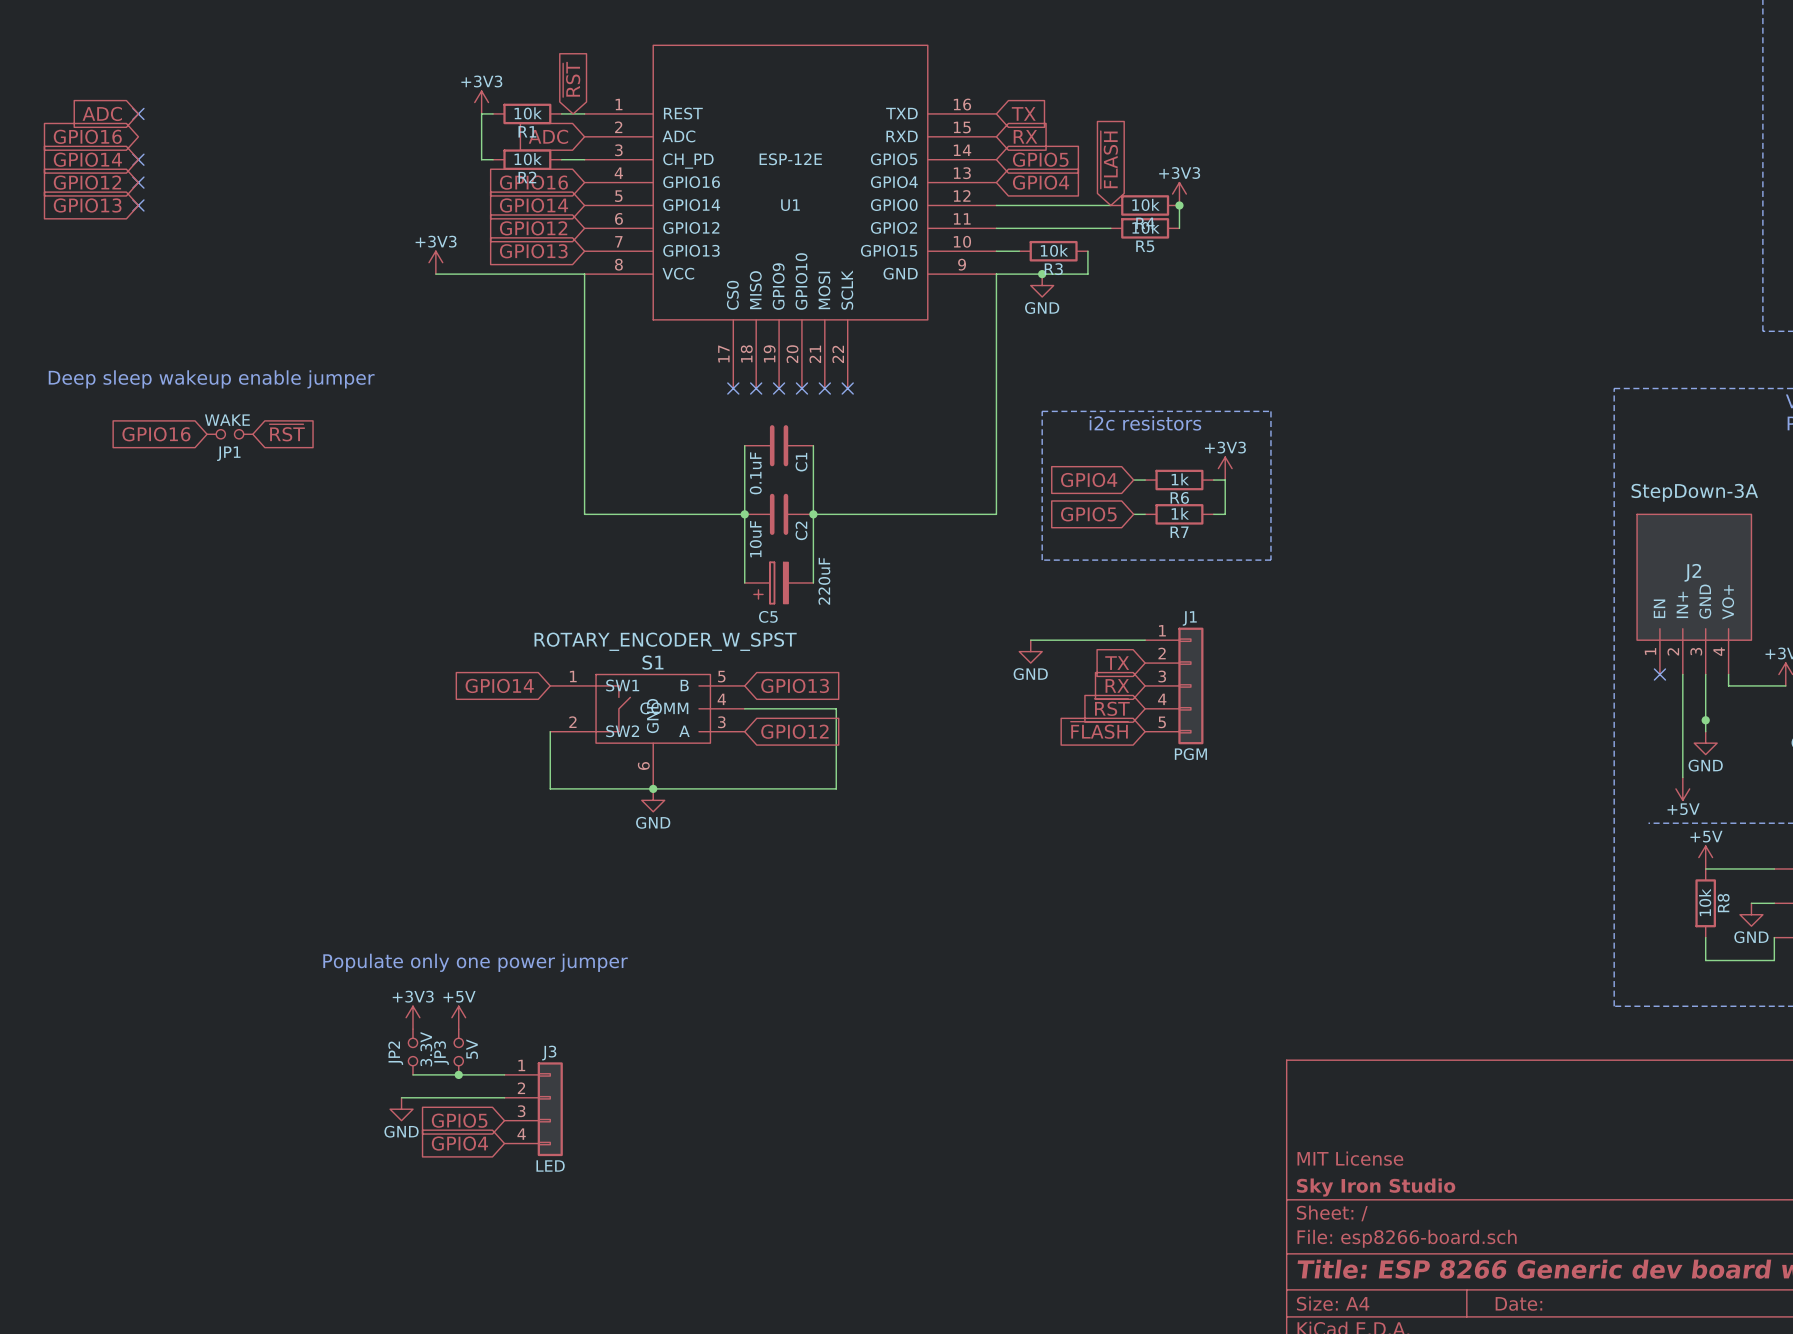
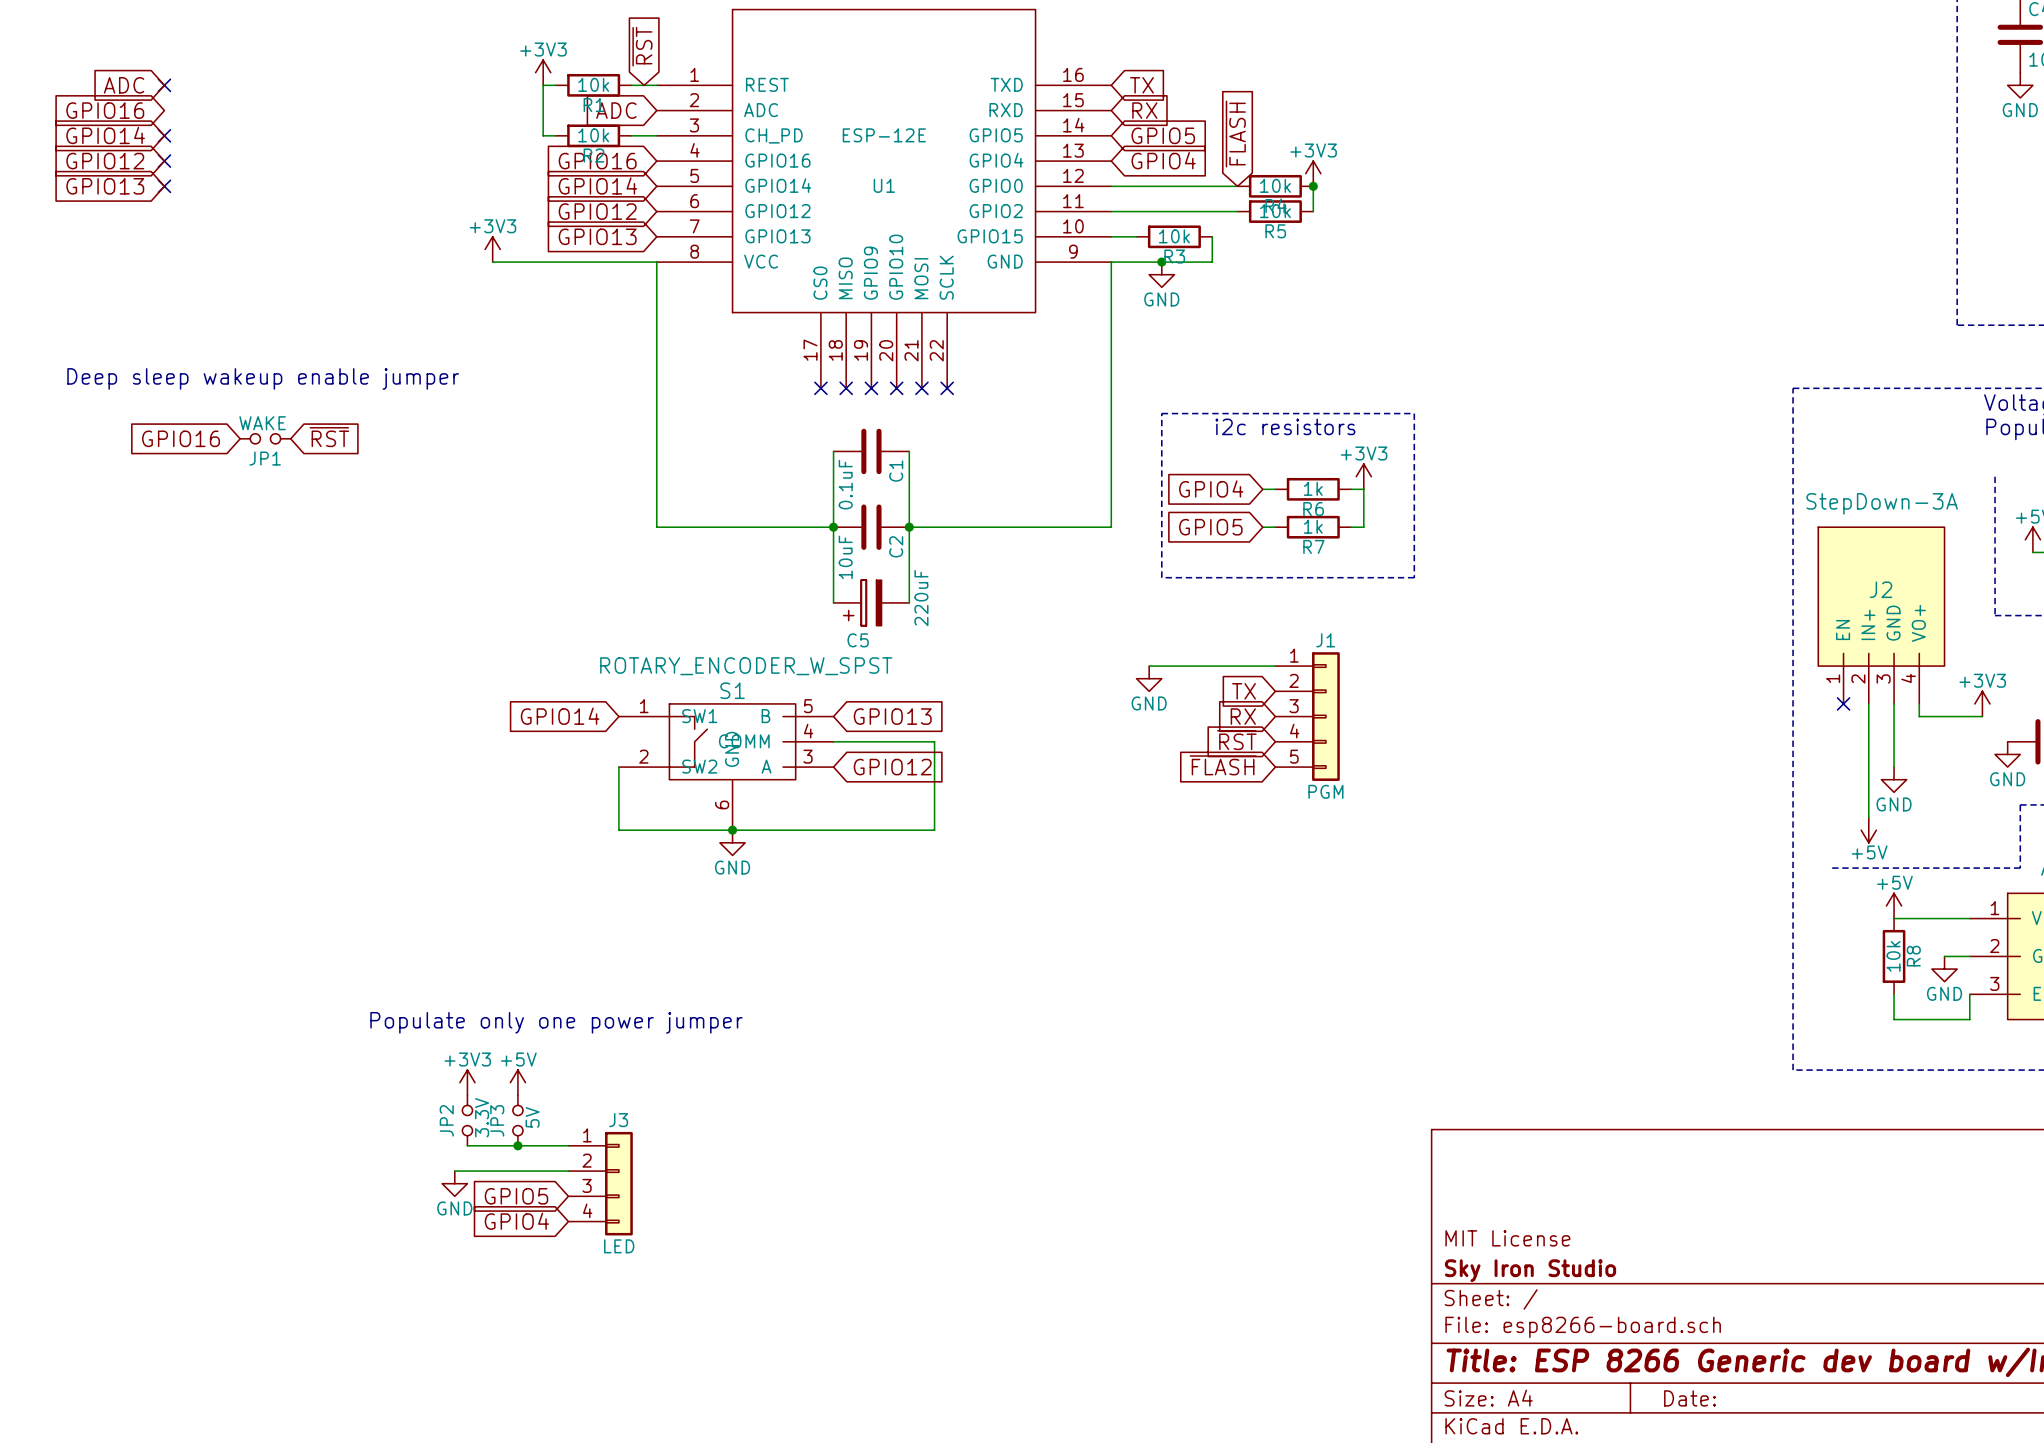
junction: (1705, 720) -> none

